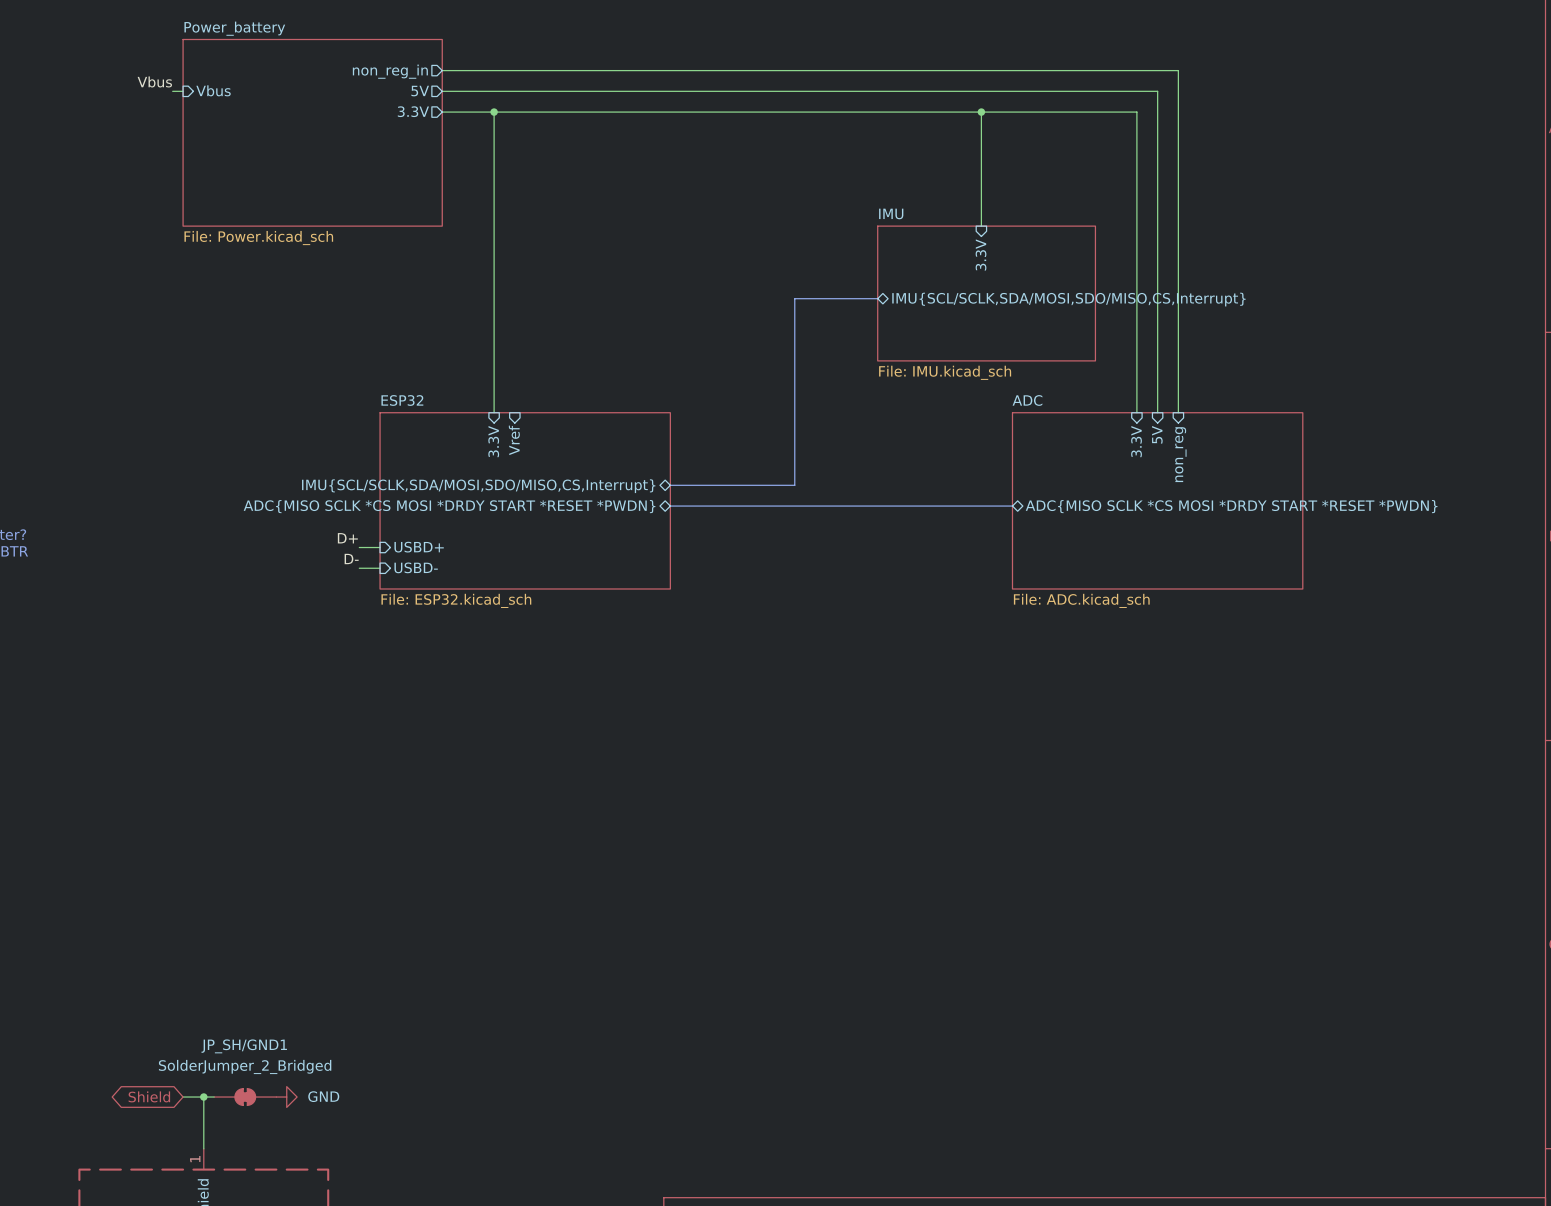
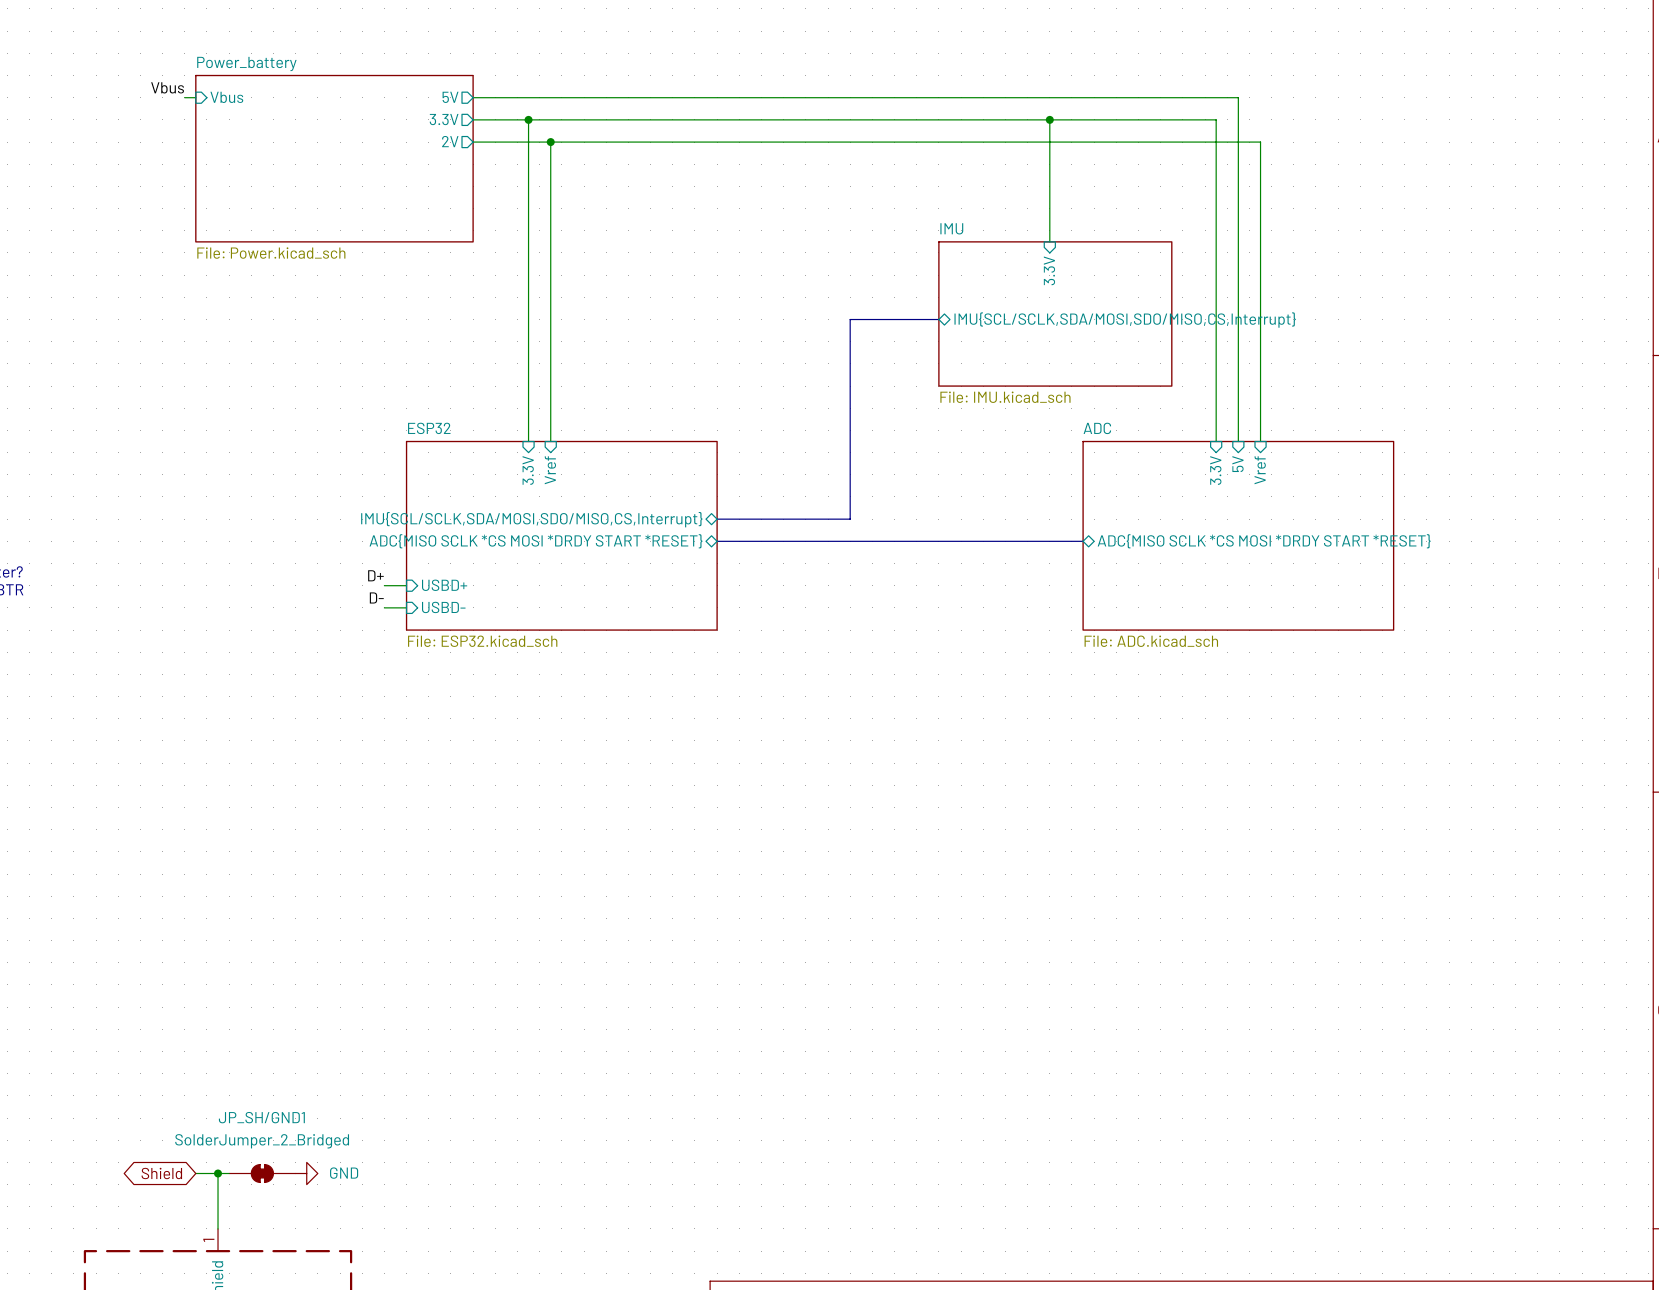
wire: (442, 70) (1178, 70) (1178, 132) -> (473, 142) (1260, 142)
sheet pin: non_reg_in (390, 71) -> none
sheet Power_battery: File: Power.kicad_sch (312, 132) -> none
sheet pin: none -> 2V (450, 141)
wire: none -> (550, 142) (550, 441)
junction: none -> (550, 142)
sheet Power_battery: none -> File: Power.kicad_sch (334, 158)
sheet pin: non_reg (1180, 454) -> Vref (1260, 470)
sheet pin: ADC{MISO SCLK *CS MOSI *DRDY START *RESET *PWDN} (449, 506) -> ADC{MISO SCLK *CS MOSI *DRDY START *RESET} (536, 541)
sheet pin: ADC{MISO SCLK *CS MOSI *DRDY START *RESET *PWDN} (1231, 506) -> ADC{MISO SCLK *CS MOSI *DRDY START *RESET} (1264, 541)

